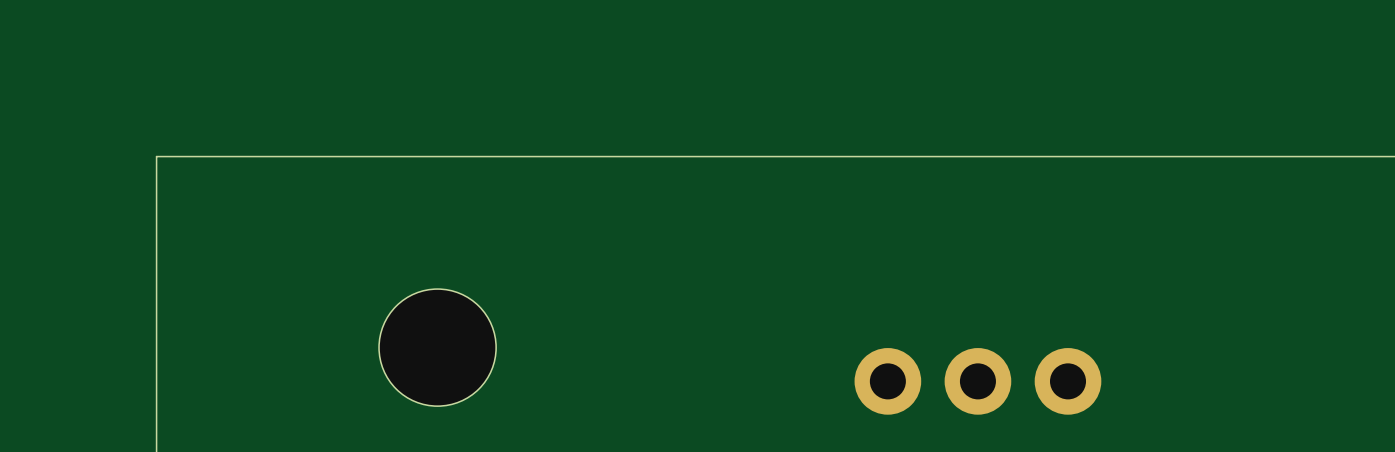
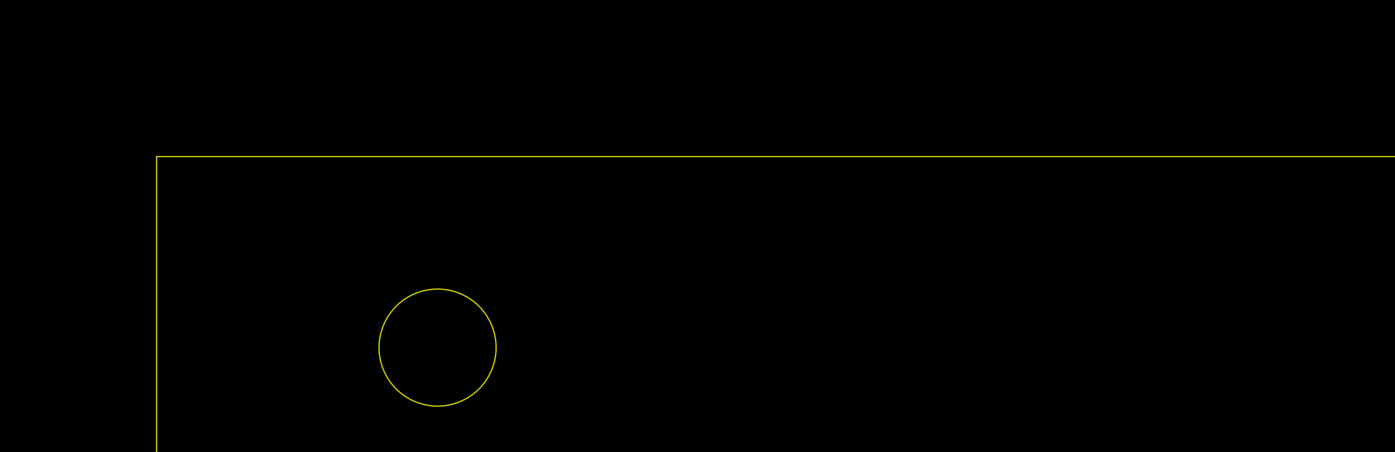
part: (977, 381) -> none

